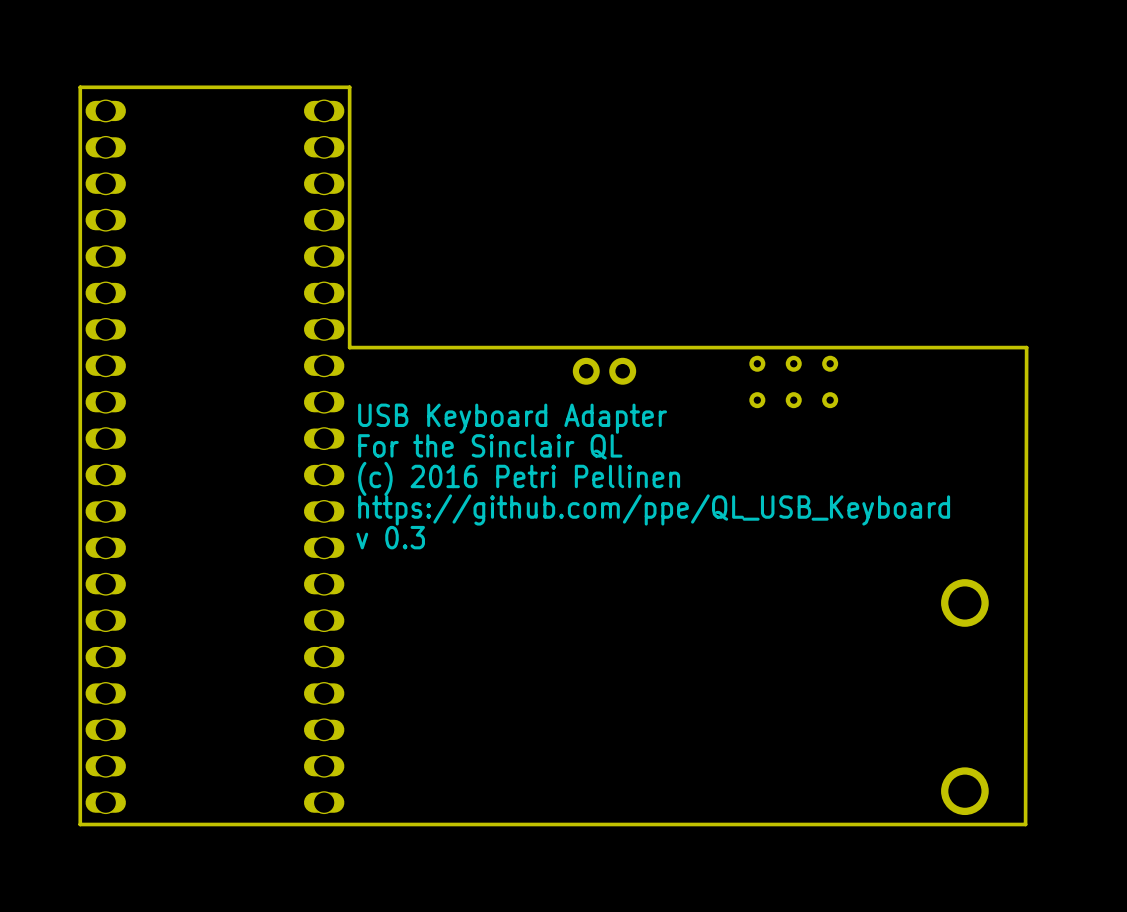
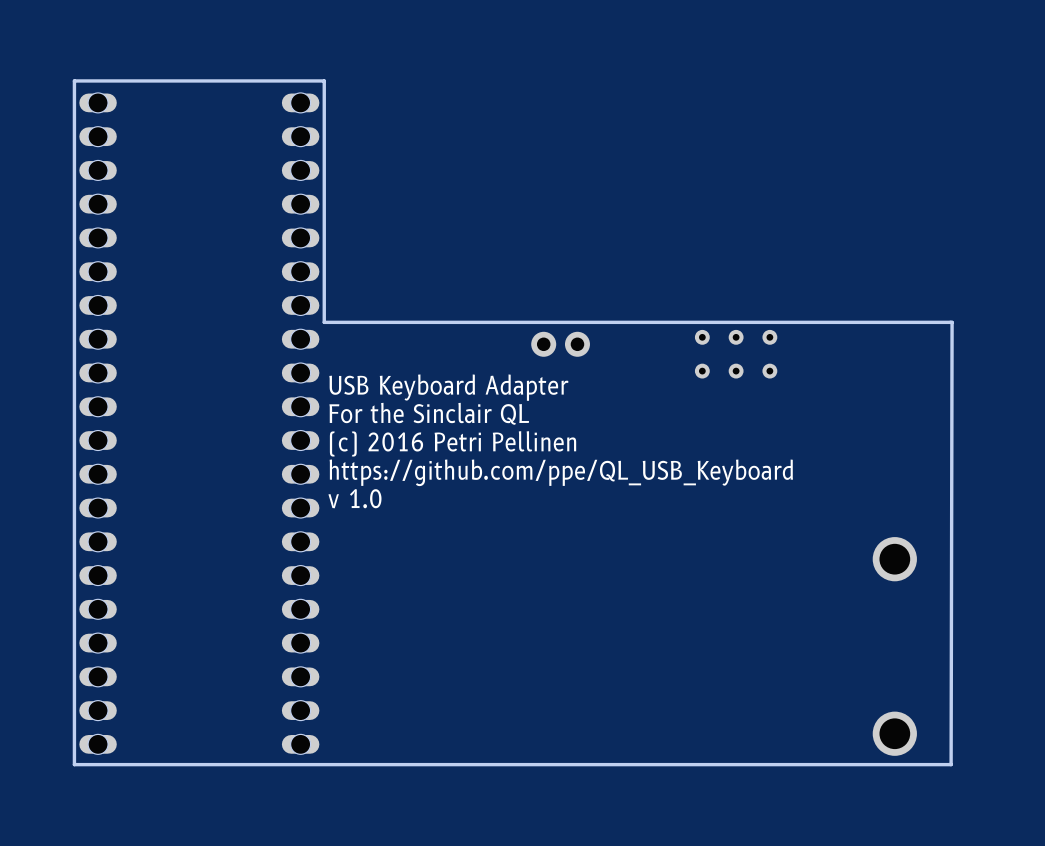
text: v 0.3 (390, 537) -> v 1.0 (354, 498)

